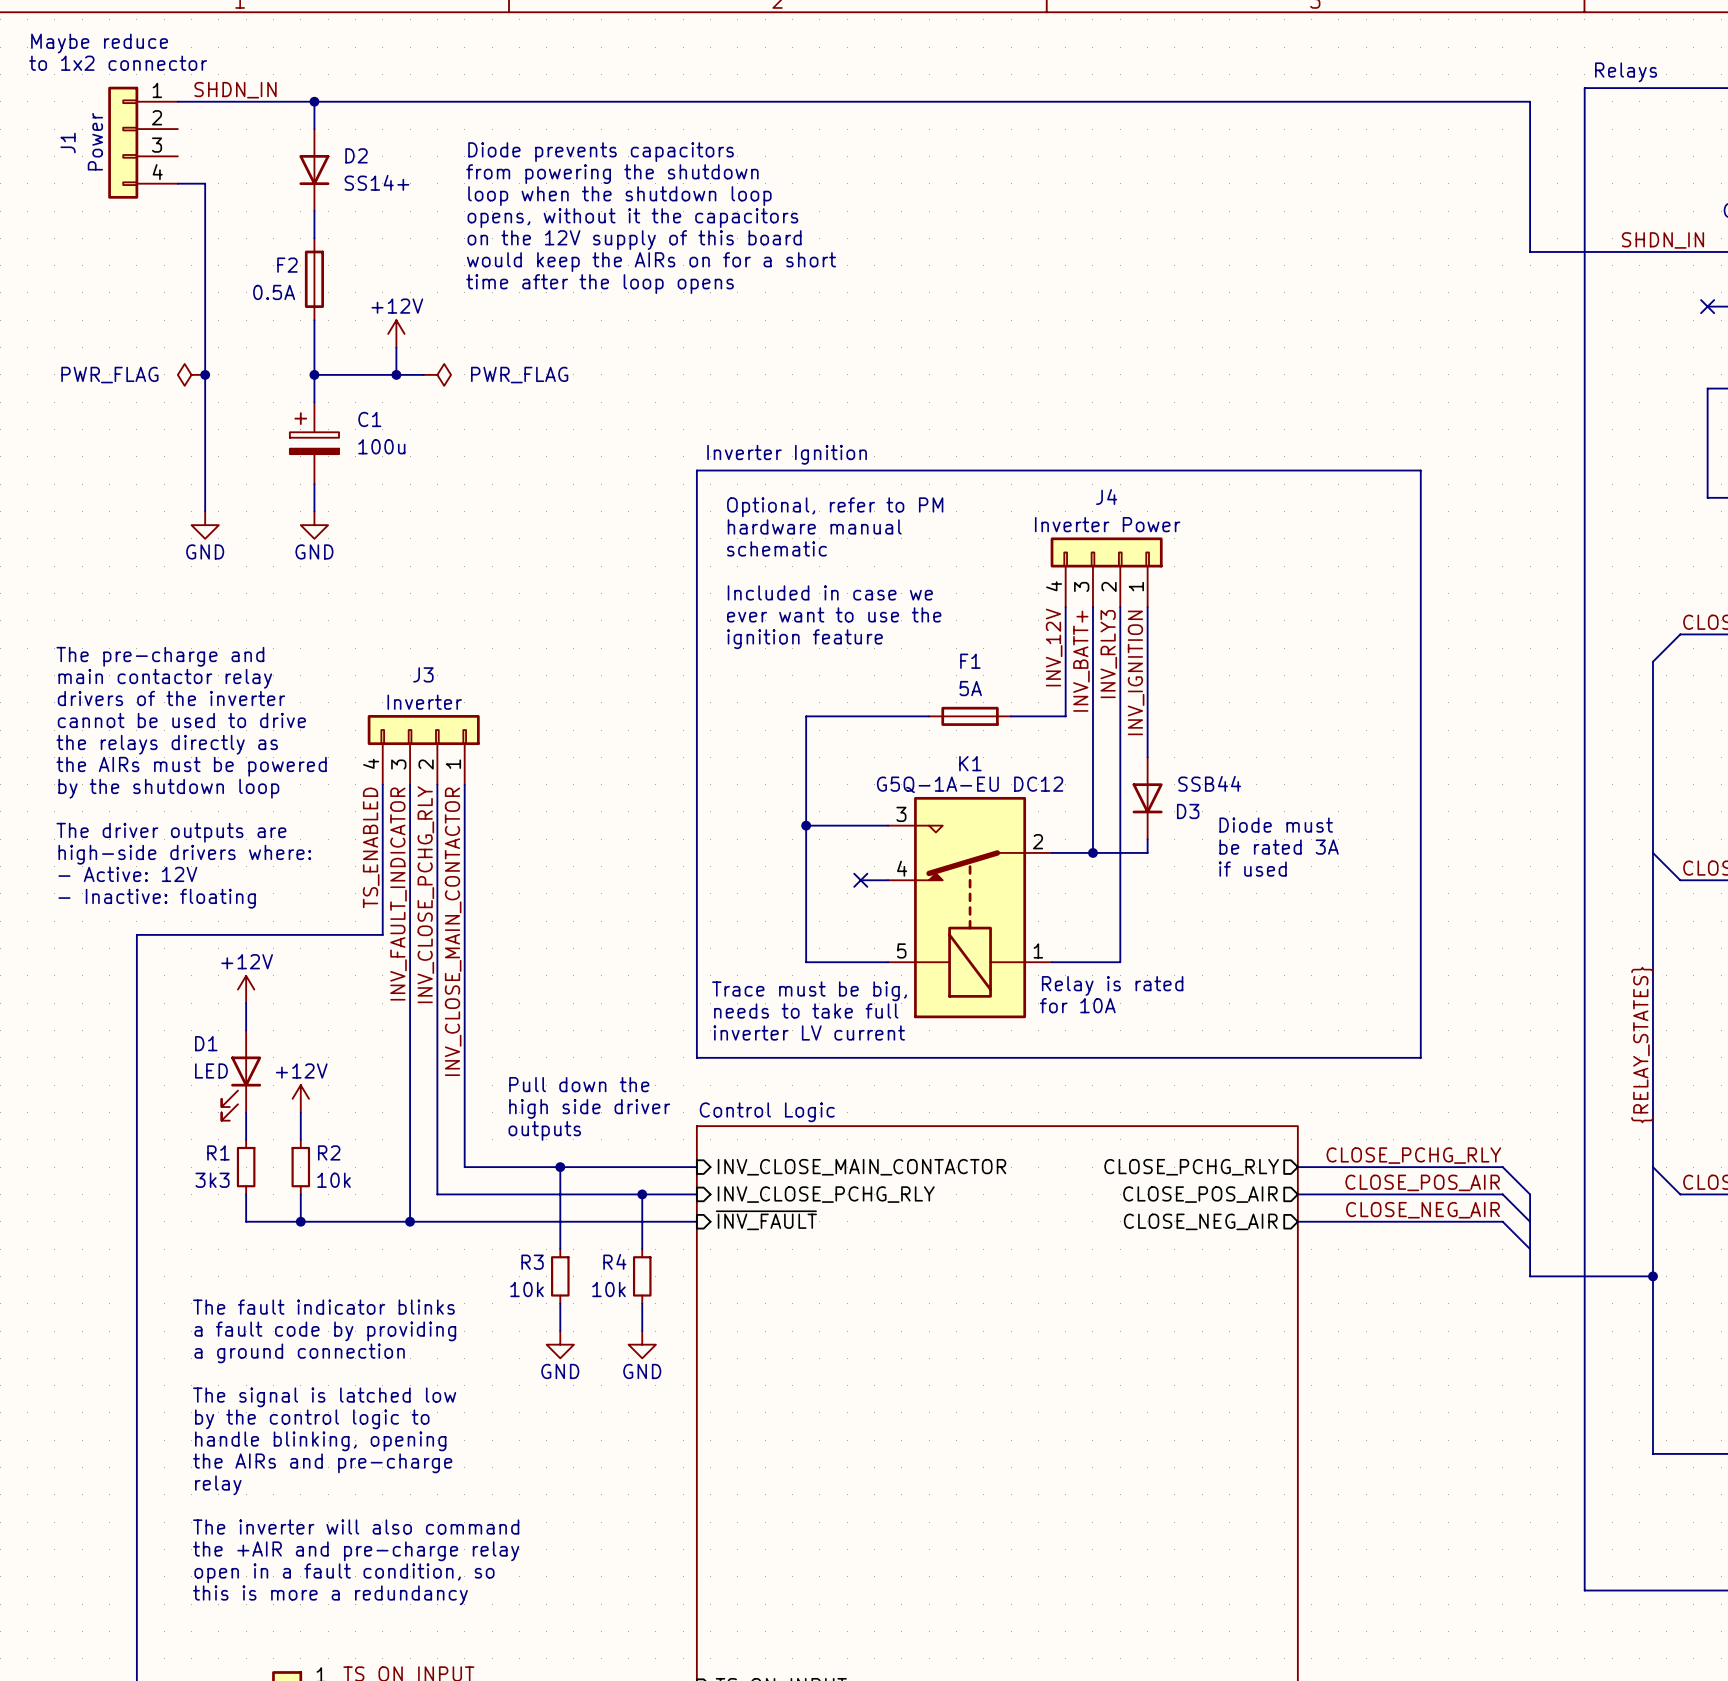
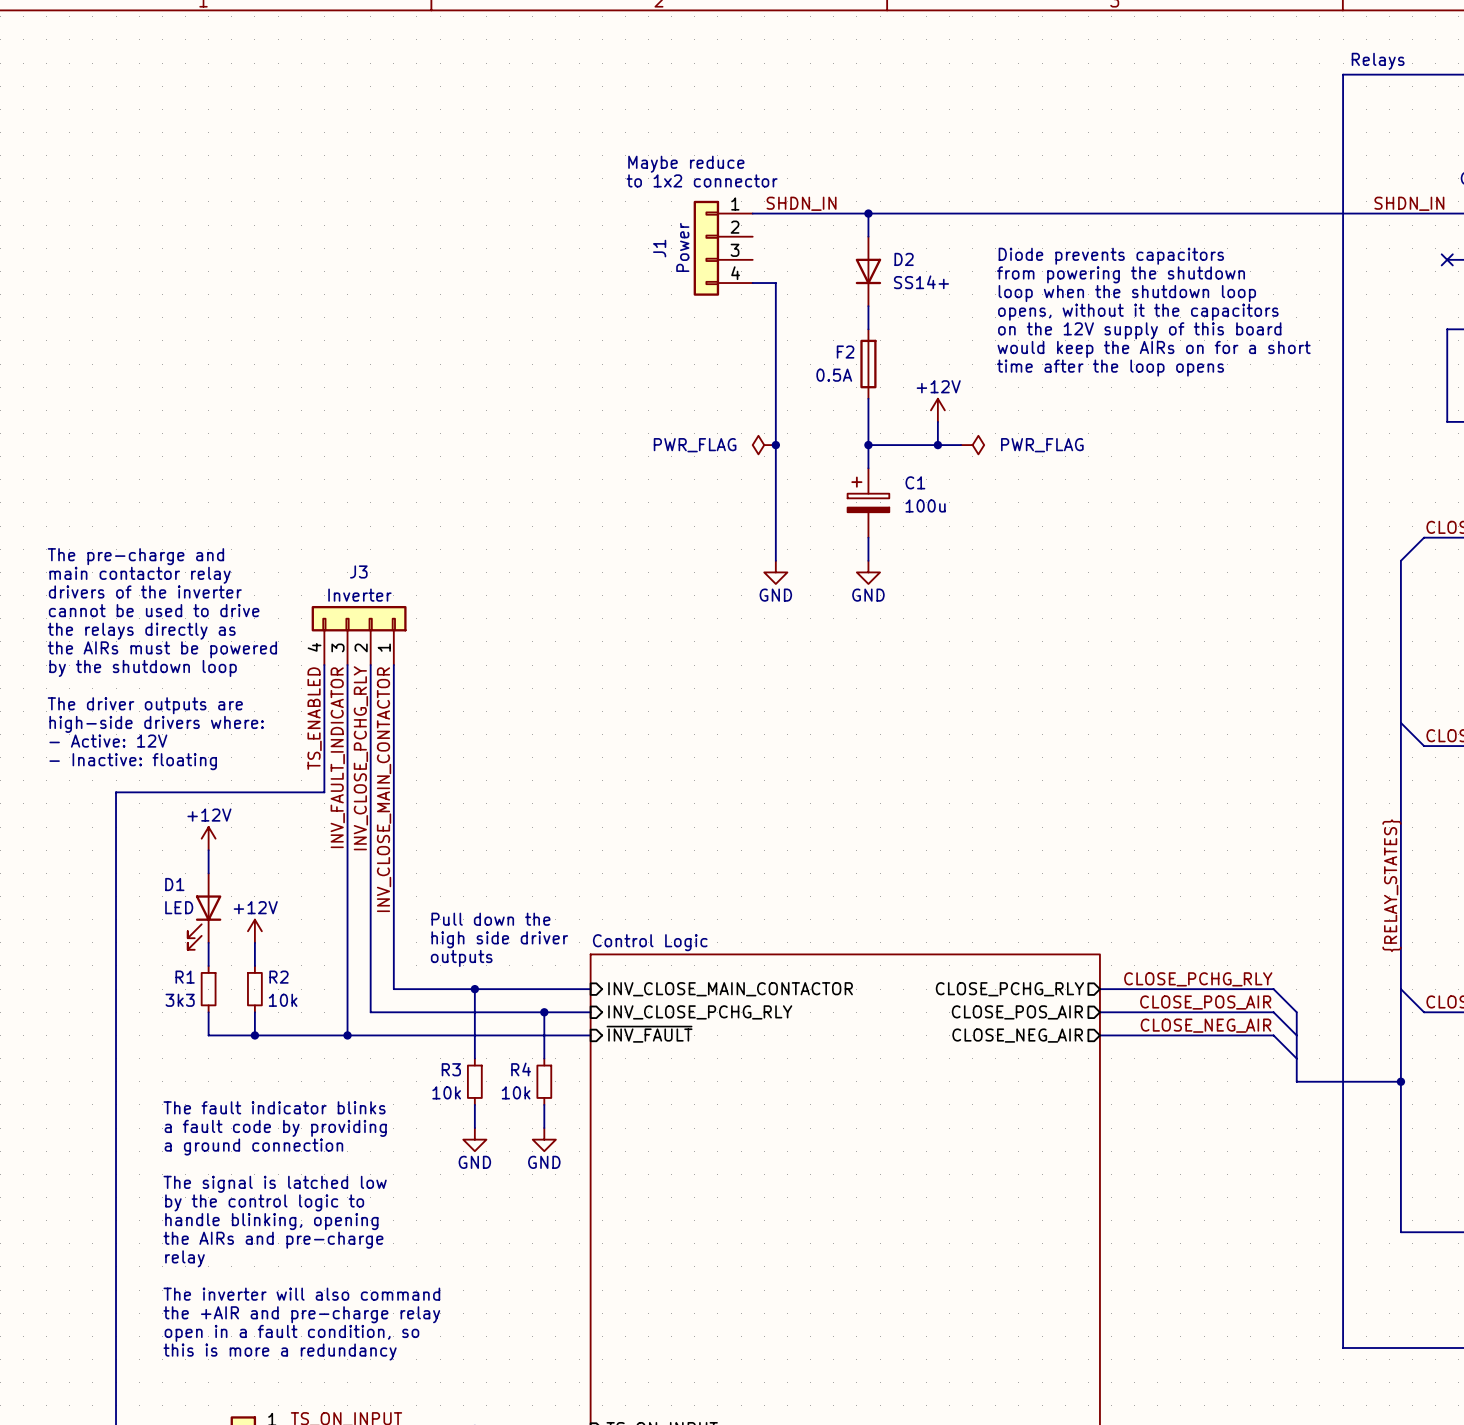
text: Maybe reduce (99, 43) -> none
text: to 1x2 connector (118, 63) -> none
label: SHDN_IN (235, 90) -> none
wire: (177, 101) (1530, 101) (1530, 251) -> (752, 213) (1296, 213)
wire: (314, 101) (314, 129) -> none
junction: (314, 101) -> none
J1 position: (143, 142) -> (723, 248)
text: Diode prevents capacitors (601, 152) -> none
D2 position: (314, 170) -> (868, 271)
text: from powering the shutdown (612, 174) -> none
wire: (177, 183) (205, 183) (205, 511) -> none
text: none -> Maybe reduce (686, 164)
text: loop when the shutdown loop (619, 196) -> none
wire: (314, 211) (314, 238) -> none
text: none -> to 1x2 connector (702, 180)
text: opens, without it the capacitors (632, 218) -> none
text: on the 12V supply of this board (634, 240) -> none
label: none -> SHDN_IN (801, 203)
wire: none -> (868, 213) (868, 236)
junction: none -> (868, 213)
text: would keep the AIRs on for a short (651, 262) -> none
F2 position: (314, 279) -> (868, 364)
text: time after the loop opens (600, 284) -> none
text: none -> Diode prevents capacitors (1111, 256)
wire: (314, 320) (314, 402) -> none
text: none -> from powering the shutdown (1120, 274)
power symbol: +12V (396, 333) -> none
wire: none -> (752, 283) (775, 283) (775, 560)
text: none -> loop when the shutdown loop (1127, 293)
wire: (396, 347) (396, 374) -> none
wire: none -> (868, 306) (868, 329)
text: none -> opens, without it the capacitors (1138, 312)
power symbol: PWR_FLAG (191, 374) -> none
junction: (205, 374) -> none
wire: (314, 374) (423, 374) -> none
junction: (314, 374) -> none
junction: (396, 374) -> none
power symbol: PWR_FLAG (437, 374) -> none
text: none -> on the 12V supply of this board (1139, 330)
text: none -> would keep the AIRs on for a short (1154, 349)
text: none -> time after the loop opens (1110, 368)
C1 position: (314, 443) -> (868, 502)
text: Inverter Ignition (787, 454) -> none
line: (696, 470) (1420, 470) (1420, 1057) (696, 1057) (696, 470) -> none
wire: none -> (868, 398) (868, 468)
wire: (314, 484) (314, 511) -> none
power symbol: none -> +12V (937, 410)
wire: none -> (937, 421) (937, 445)
text: Optional, refer to PM (835, 507) -> none
power symbol: GND (205, 525) -> none
power symbol: GND (314, 525) -> none
power symbol: none -> PWR_FLAG (764, 445)
junction: none -> (775, 445)
wire: none -> (868, 445) (961, 445)
junction: none -> (868, 445)
junction: none -> (937, 445)
power symbol: none -> PWR_FLAG (972, 445)
text: hardware manual (814, 526) -> none
text: schematic (776, 548) -> none
J4: Inverter Power (1106, 572) -> none
text: Included in case we (830, 592) -> none
wire: (1065, 607) (1065, 716) (1011, 716) -> none
wire: (1092, 607) (1092, 852) -> none
wire: (1120, 607) (1120, 962) (1052, 962) -> none
wire: (1147, 607) (1147, 757) -> none
text: ever want to use the (834, 614) -> none
wire: none -> (868, 537) (868, 560)
text: ignition feature (804, 639) -> none
label: INV_12V (1054, 647) -> none
label: INV_RLY3 (1108, 654) -> none
label: INV_BATT+ (1081, 661) -> none
label: INV_IGNITION (1136, 672) -> none
power symbol: none -> GND (775, 572)
power symbol: none -> GND (868, 572)
wire: (929, 716) (806, 716) (806, 962) (888, 962) -> none
F1: 5A (970, 716) -> none
D3: SSB44 (1147, 798) -> none
wire: (806, 825) (888, 825) -> none
junction: (806, 825) -> none
text: Diode must (1276, 825) -> none
wire: (1147, 839) (1147, 852) (1052, 852) -> none
text: be rated 3A (1279, 847) -> none
junction: (1092, 852) -> none
text: if used (1252, 869) -> none
wire: (860, 880) (888, 880) -> none
no-connect mark: (860, 880) -> none
K1: G5Q-1A-EU DC12 (970, 907) -> none
text: Relay is rated (1112, 985) -> none
text: Trace must be big, (809, 991) -> none
text: for 10A (1077, 1005) -> none
text: needs to take full (806, 1011) -> none
text: inverter LV current (809, 1032) -> none

